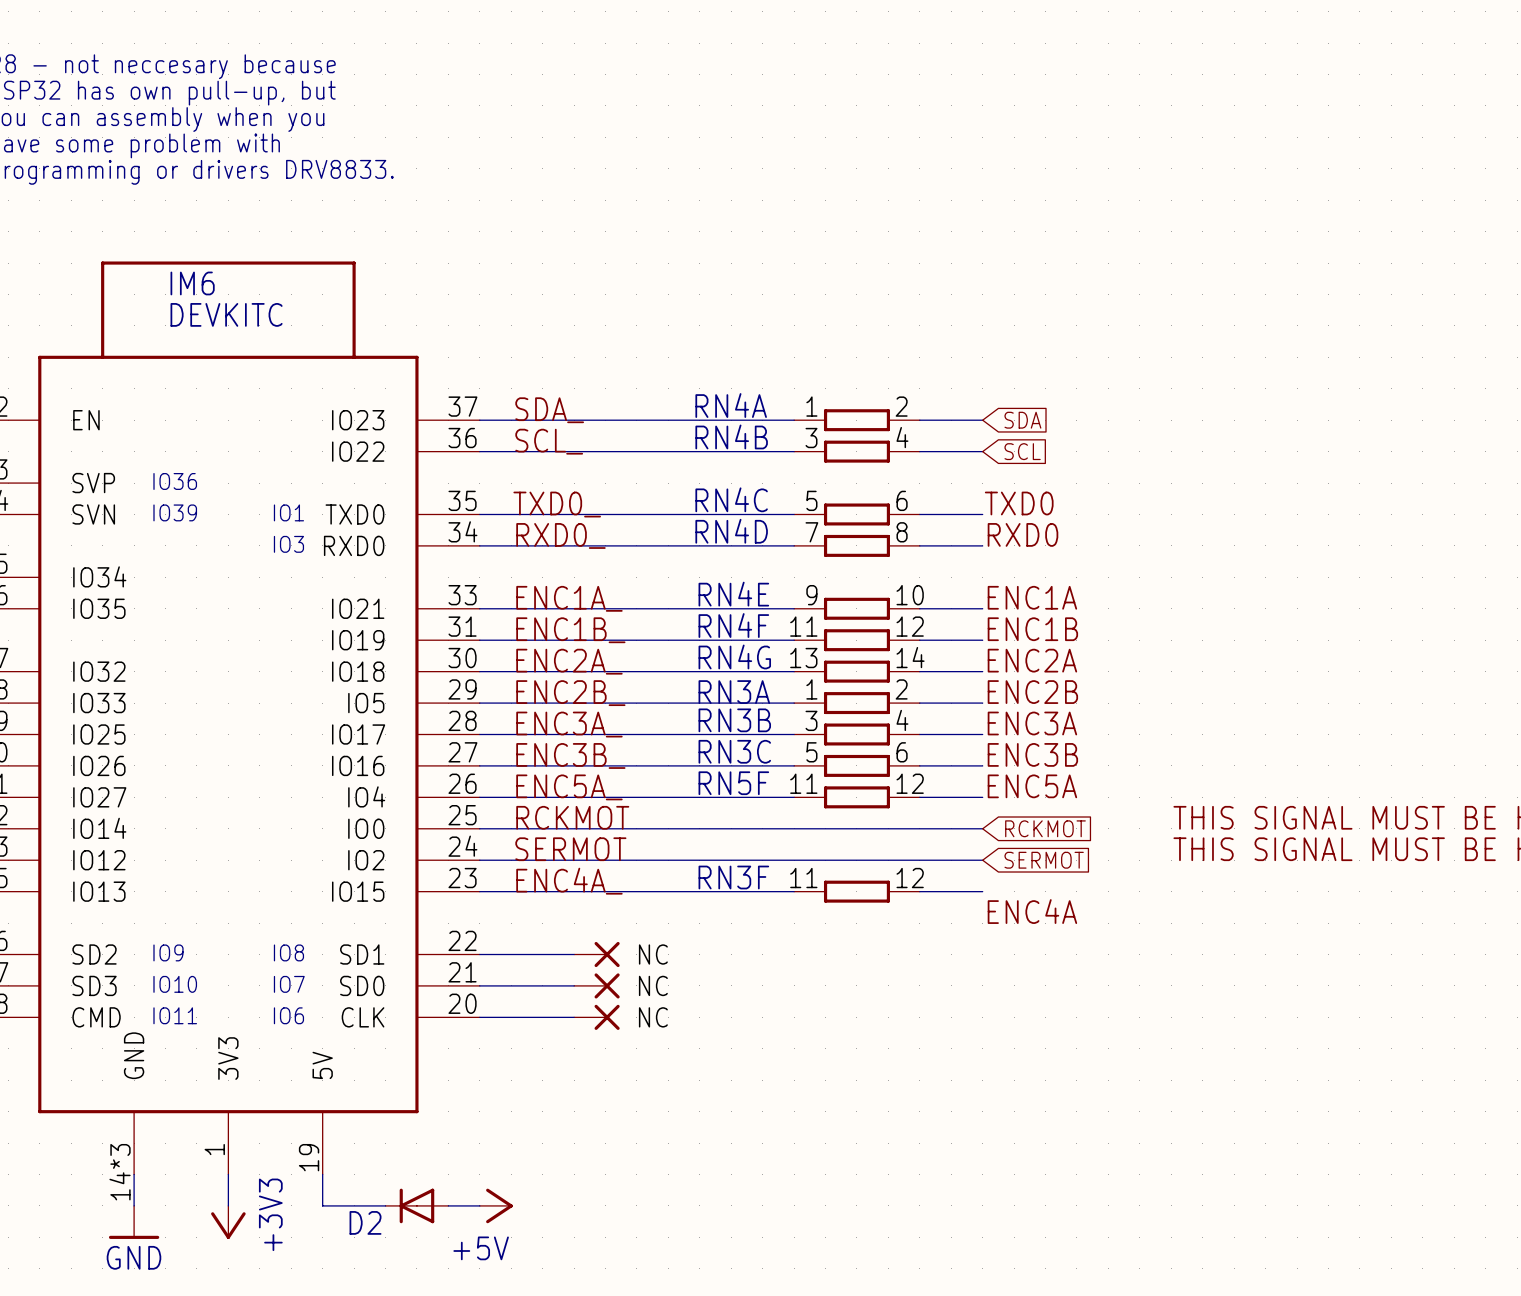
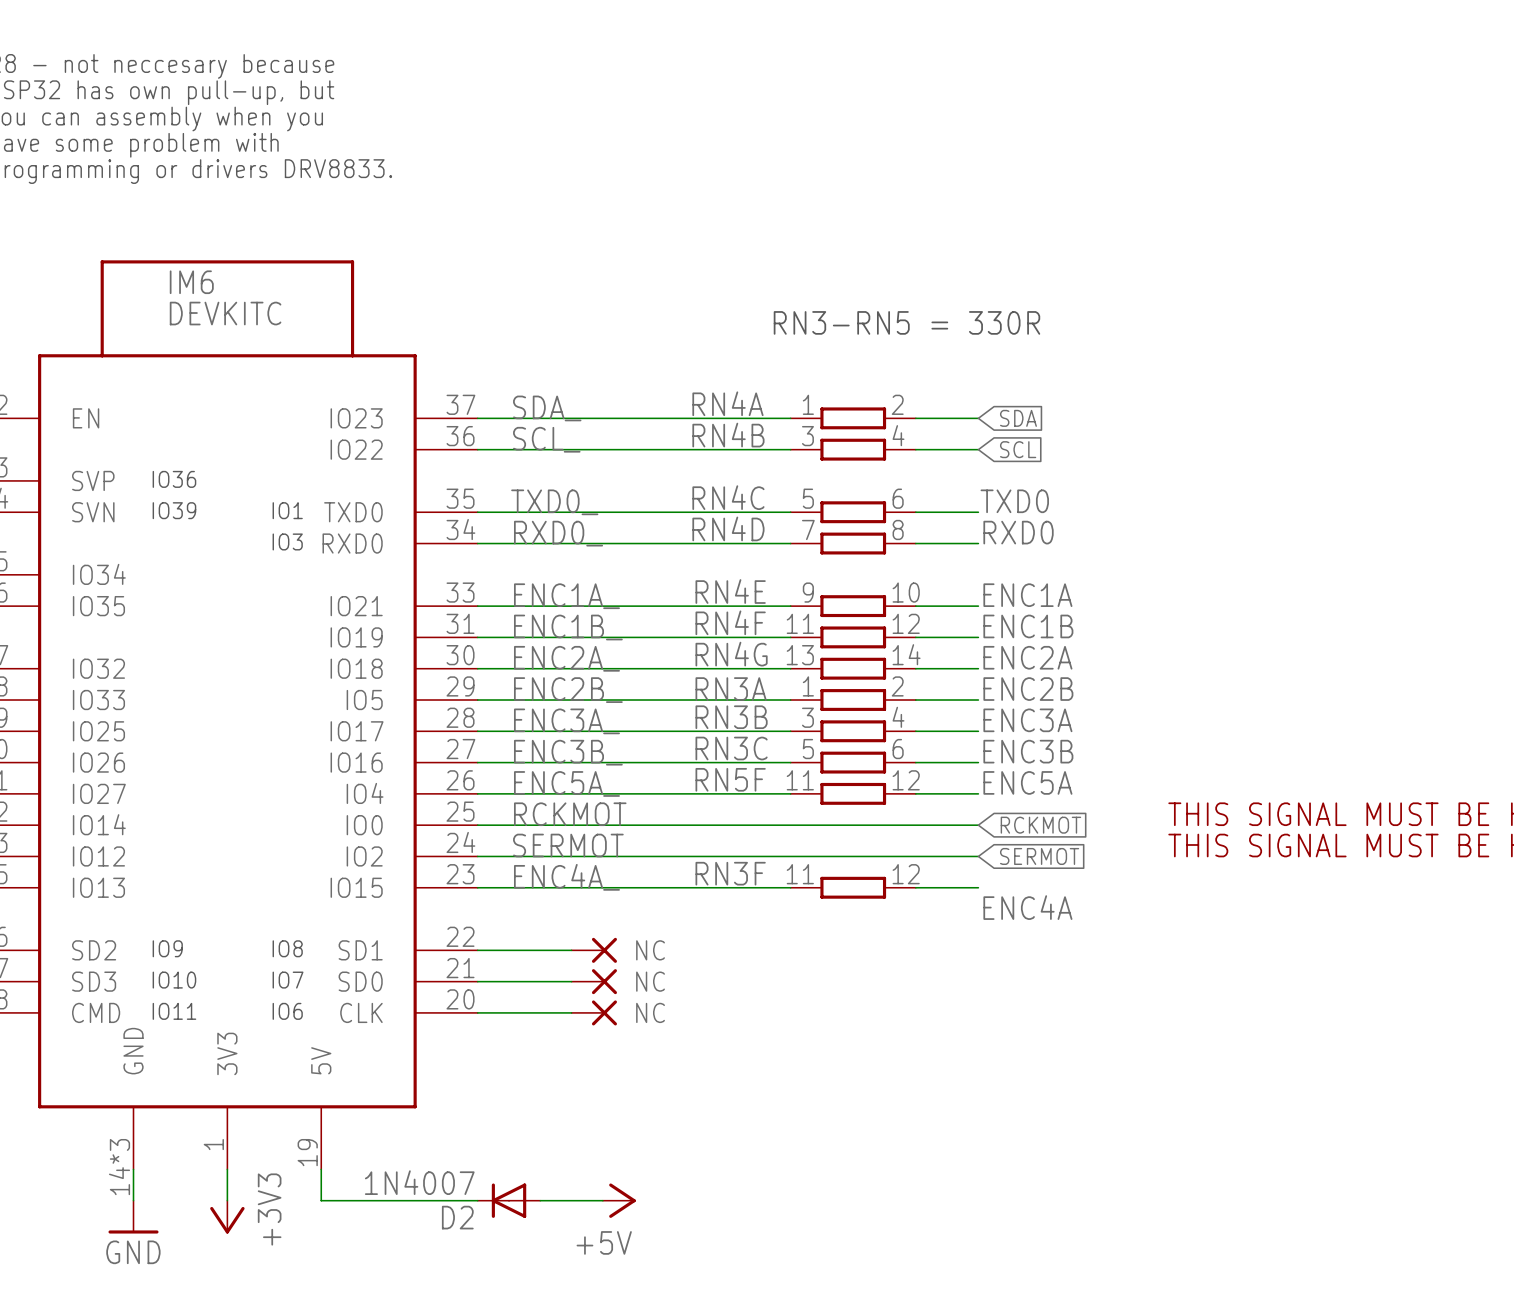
text: none -> RN3-RN5 = 330R (906, 322)
D2 value: none -> 1N4007 (419, 1182)
D2 position: (416, 1205) -> (509, 1200)
power symbol position: +5V (496, 1205) -> +5V (619, 1200)
wire: none -> (540, 1200) (602, 1200)

